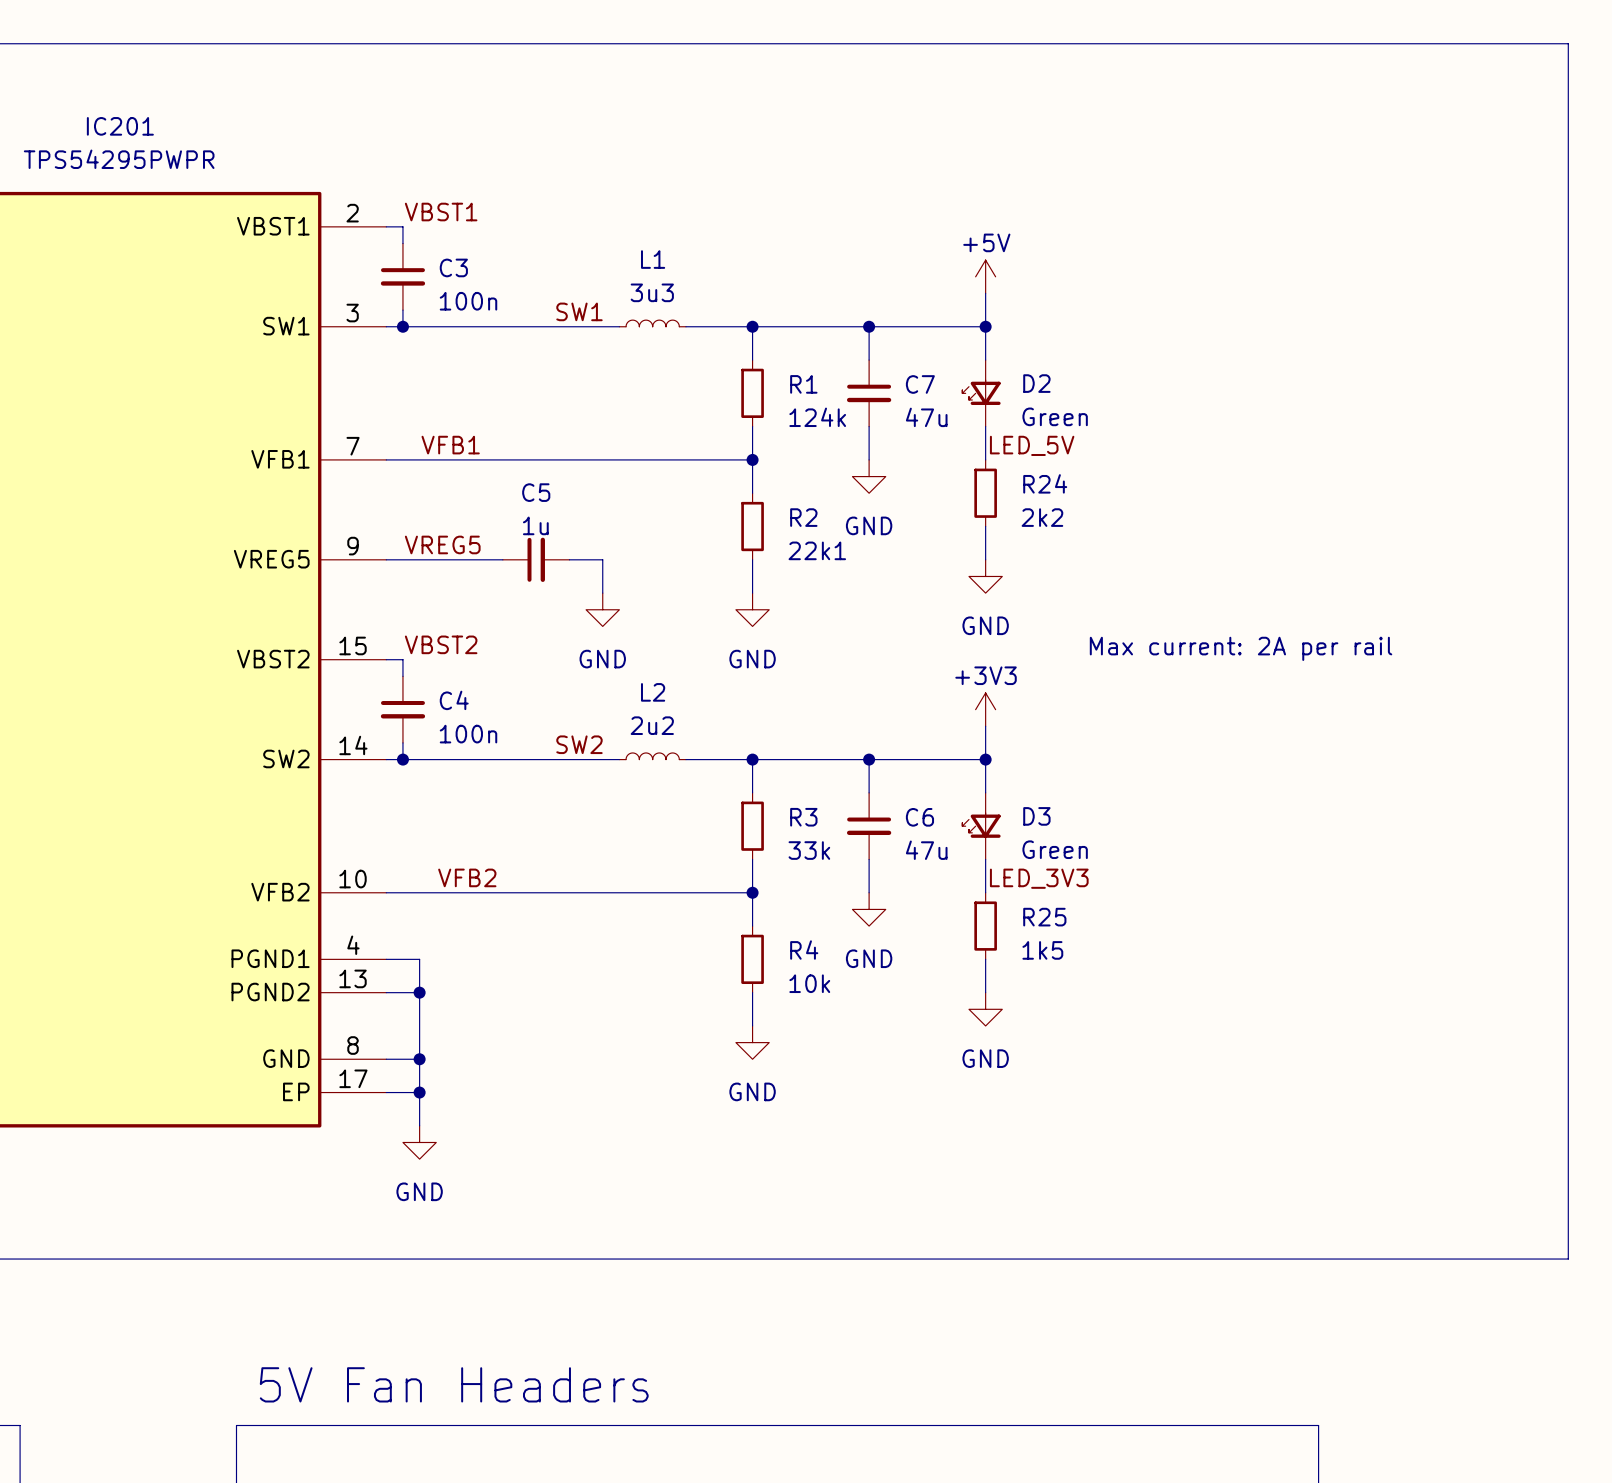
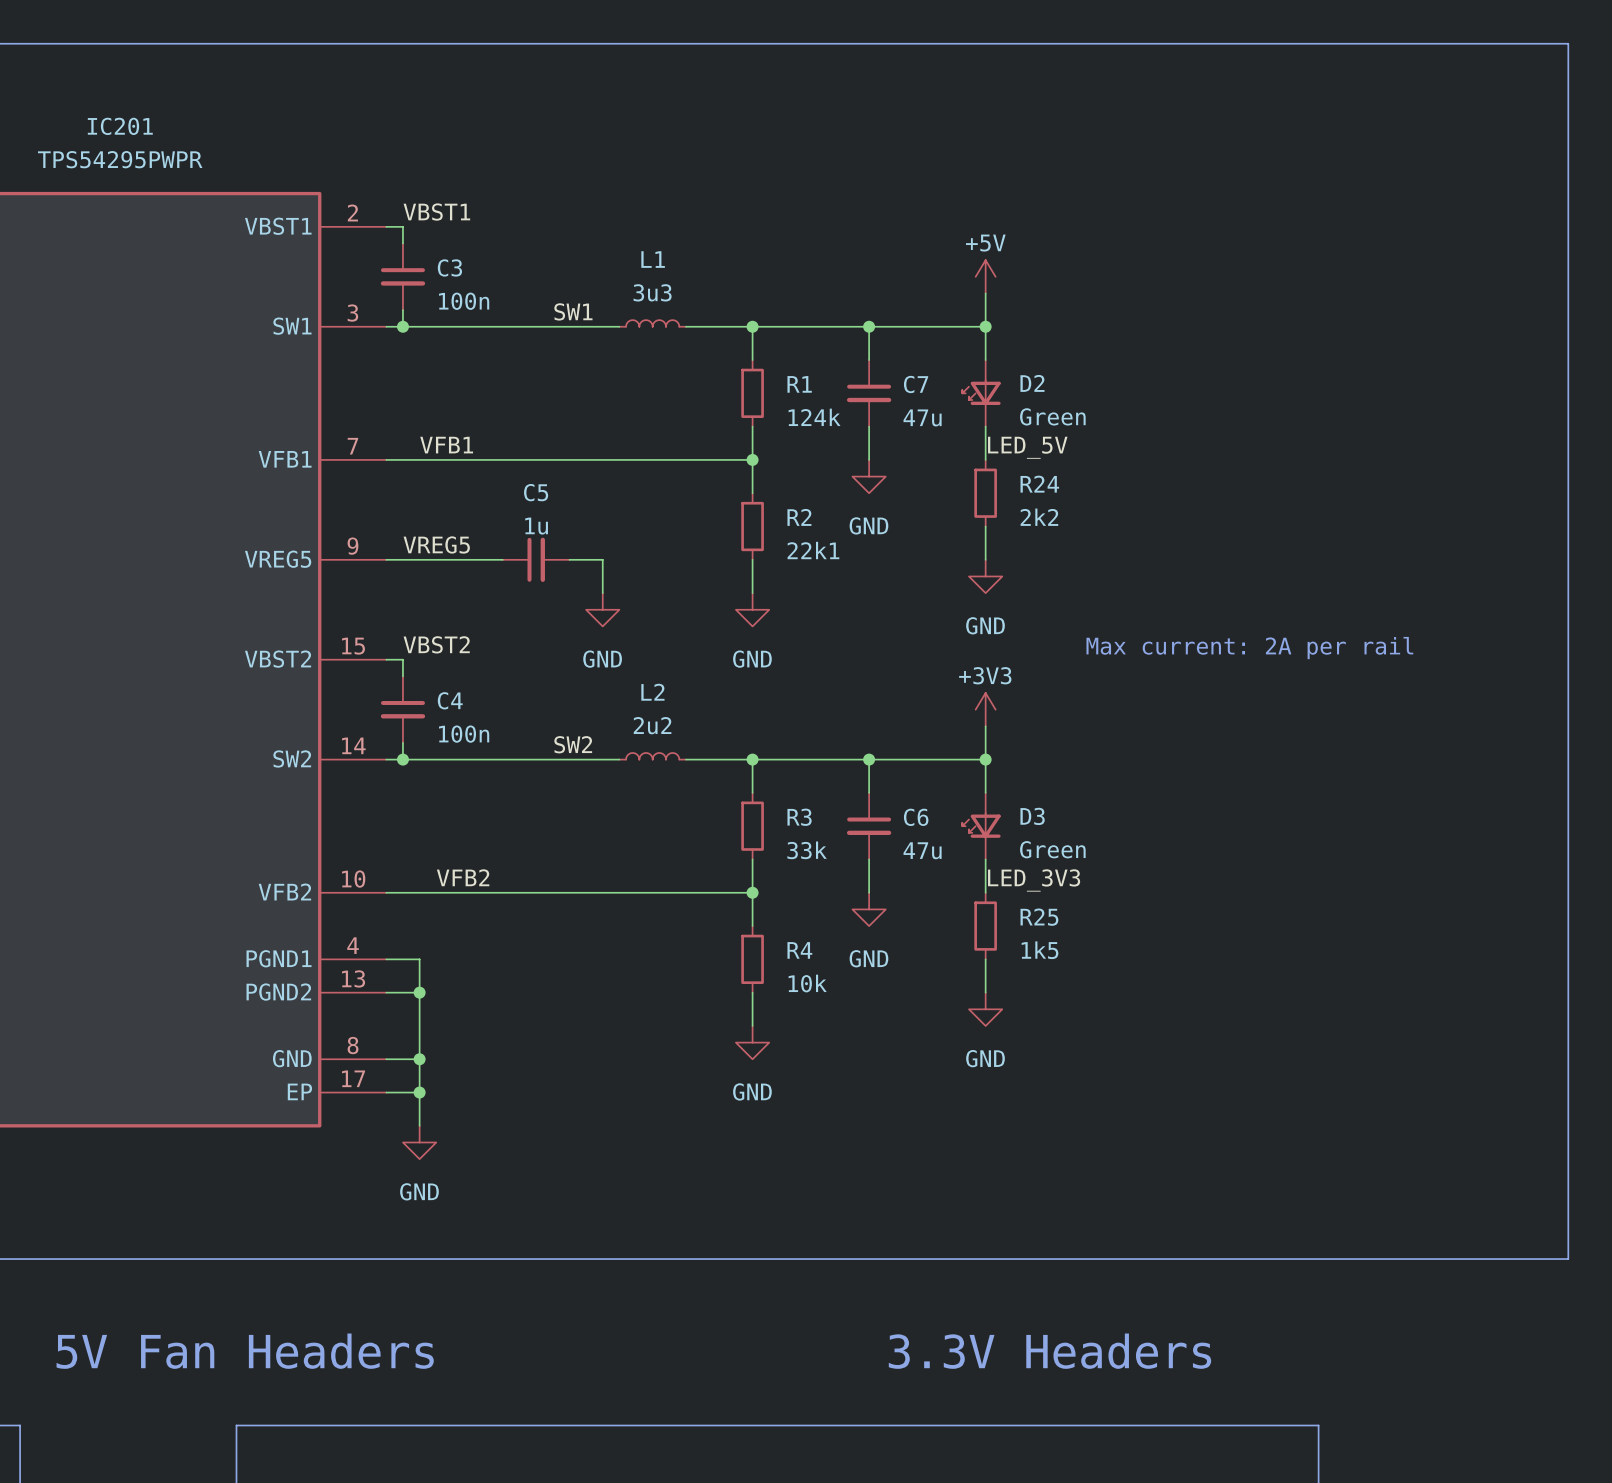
text: none -> 3.3V Headers (1049, 1351)
text position: 5V Fan Headers (454, 1384) -> 5V Fan Headers (245, 1351)

